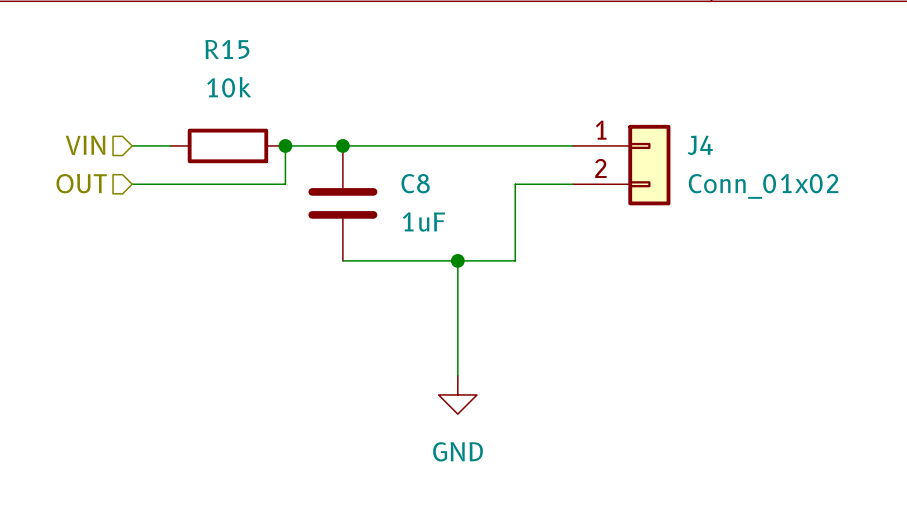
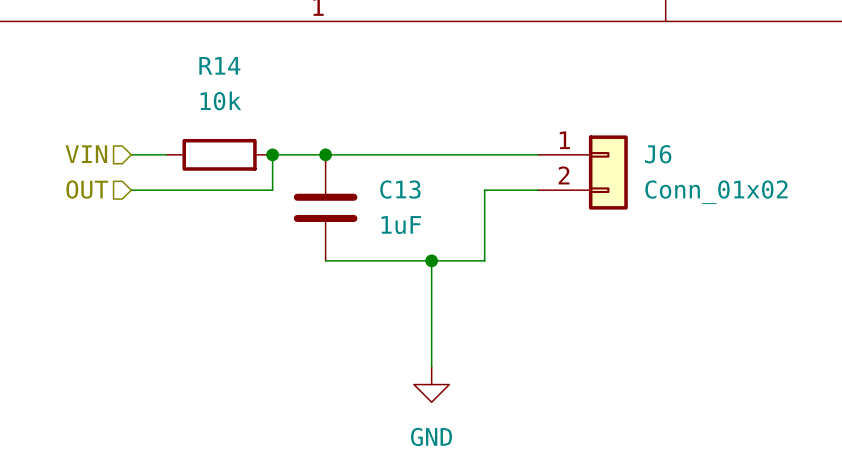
R15 name: R15 (227, 49) -> R14 (219, 65)
J4 name: J4 (700, 145) -> J6 (658, 154)
C8 name: C8 (415, 183) -> C13 (400, 189)

